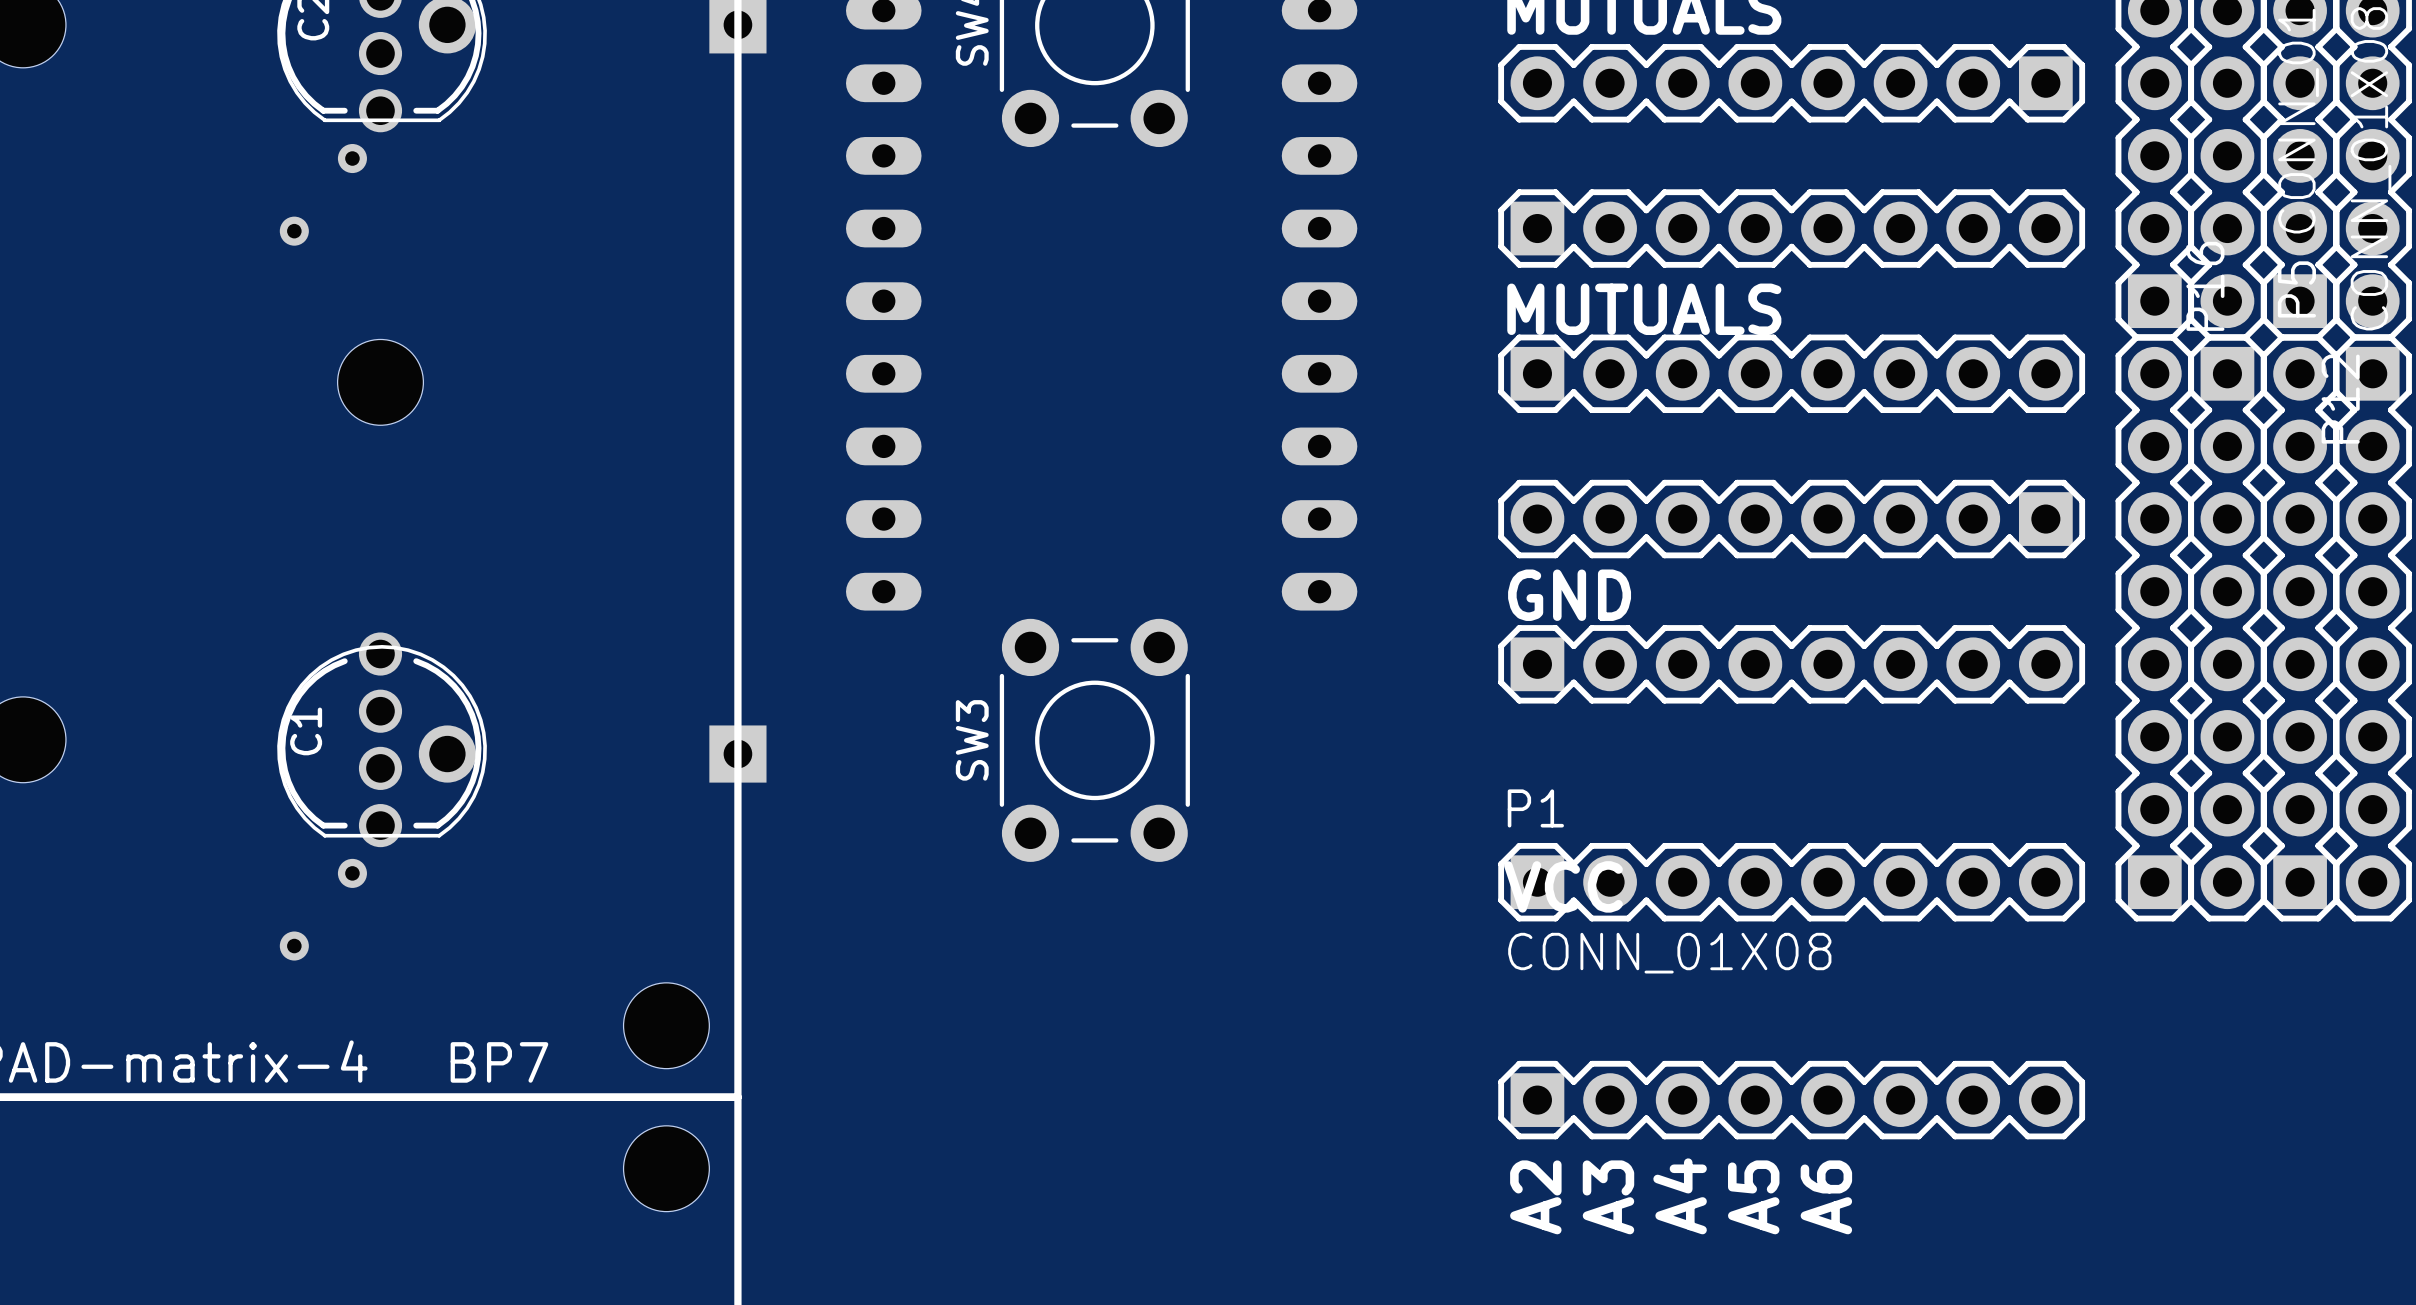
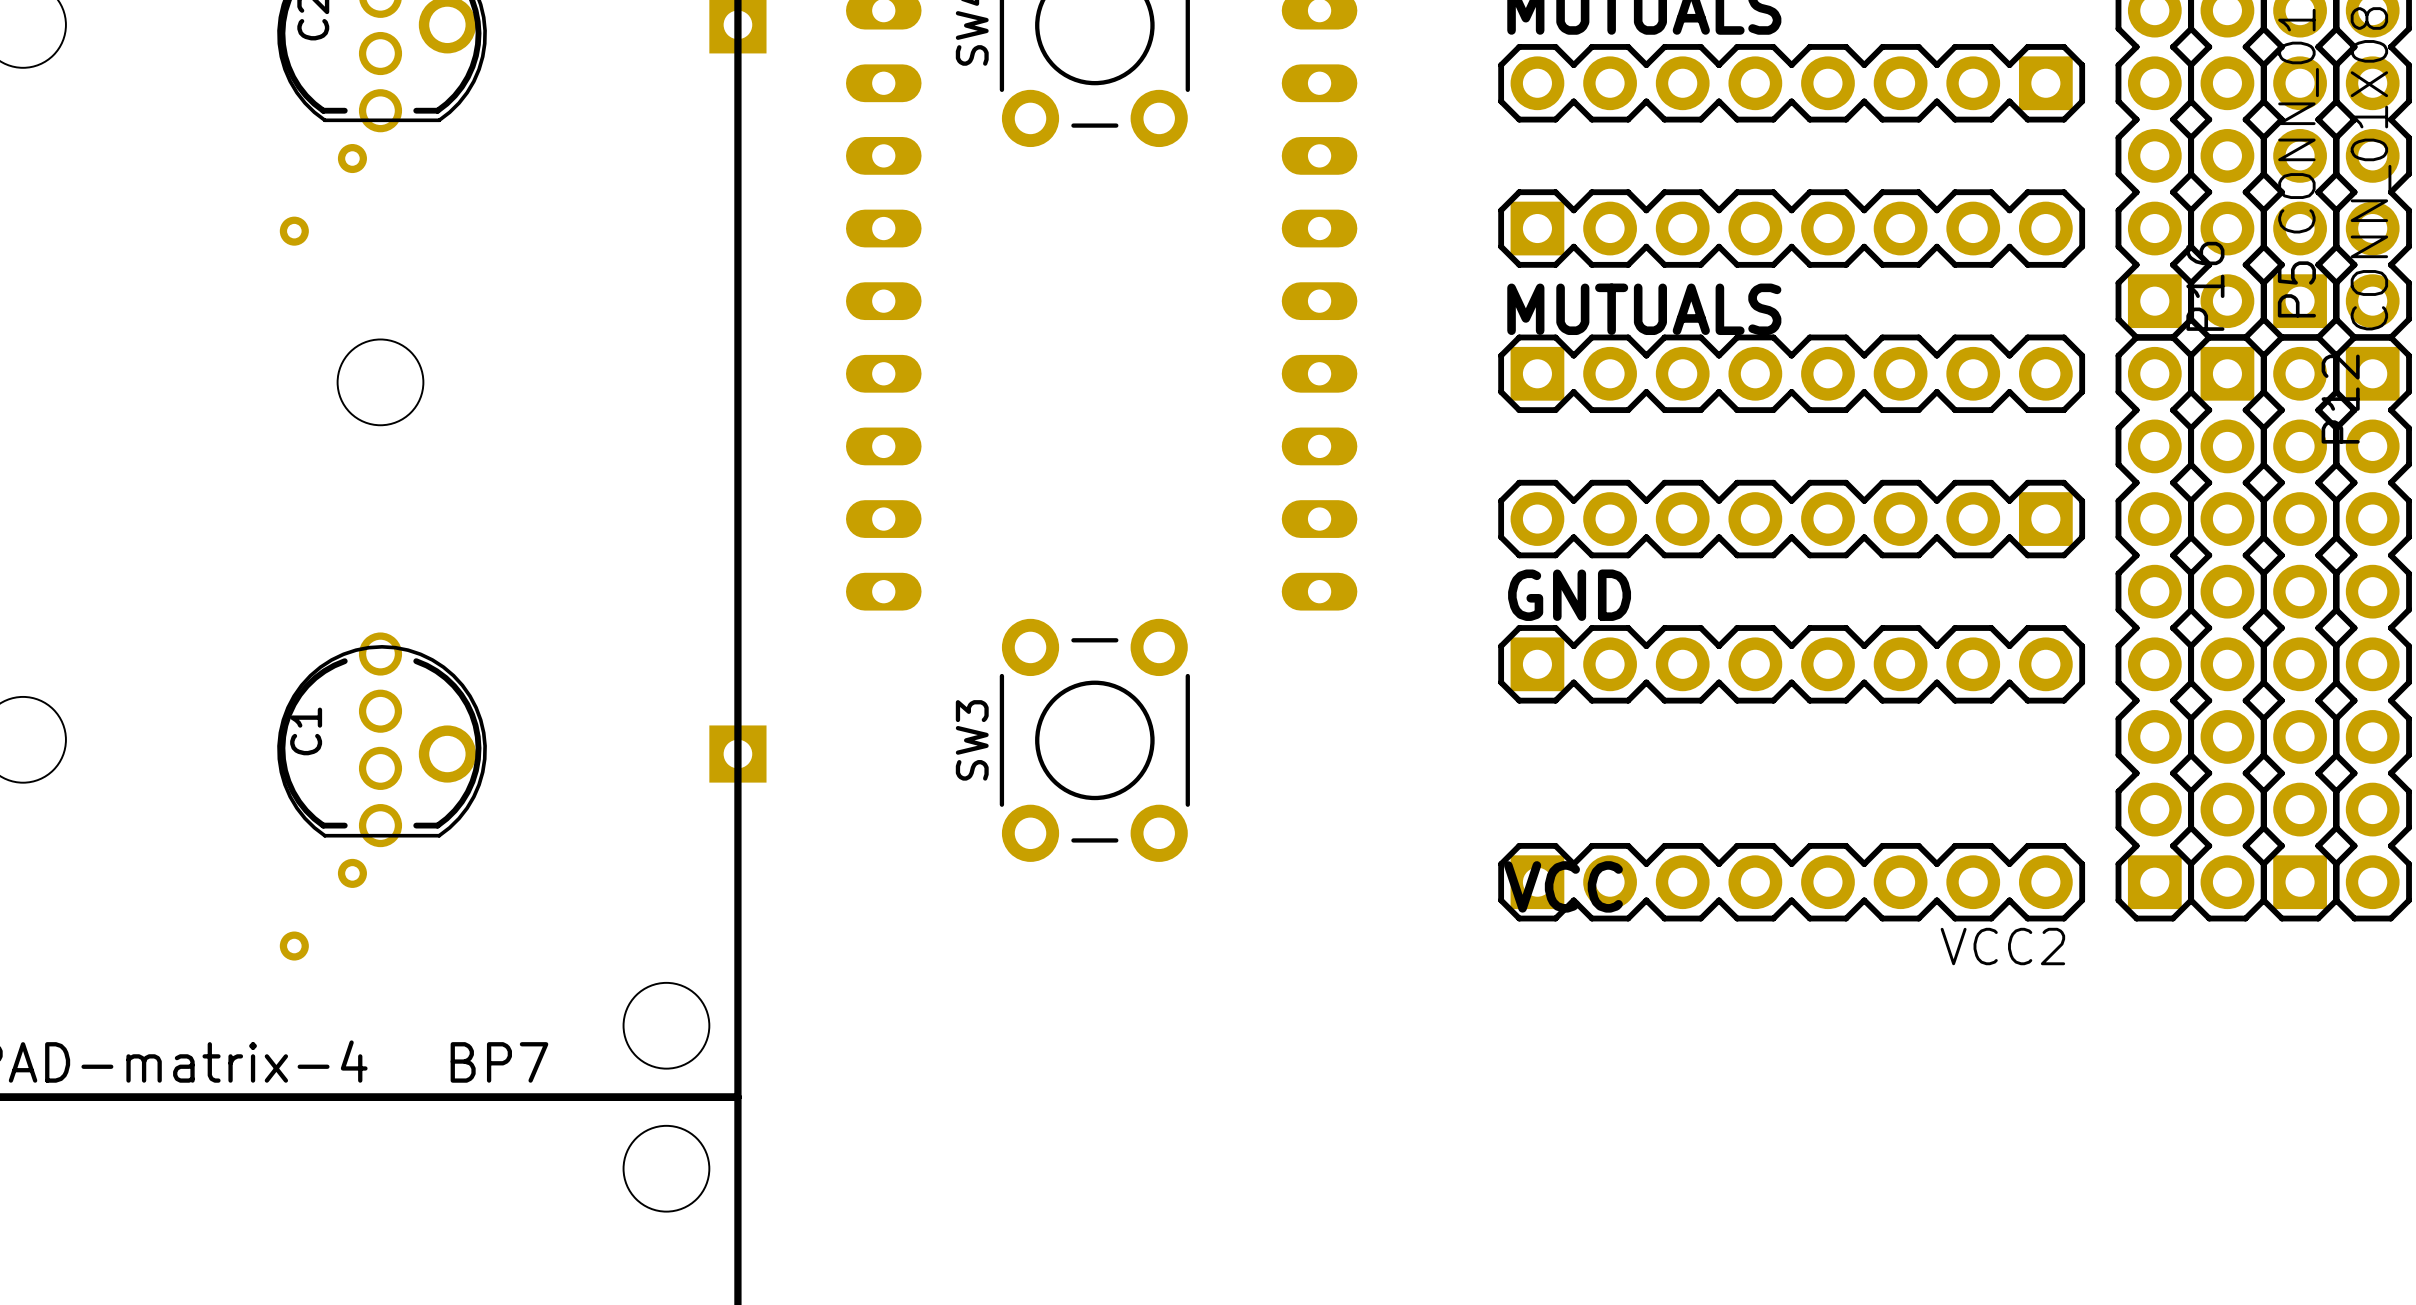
P1 name: P1 (1535, 808) -> none
P1 value: CONN_01X08 (1669, 953) -> VCC2 (2002, 946)
part: (1791, 1100) -> none
text: A4 (1680, 1196) -> none
text: A2 (1535, 1197) -> none
text: A3 (1608, 1197) -> none
text: A5 (1753, 1197) -> none
text: A6 (1826, 1197) -> none

